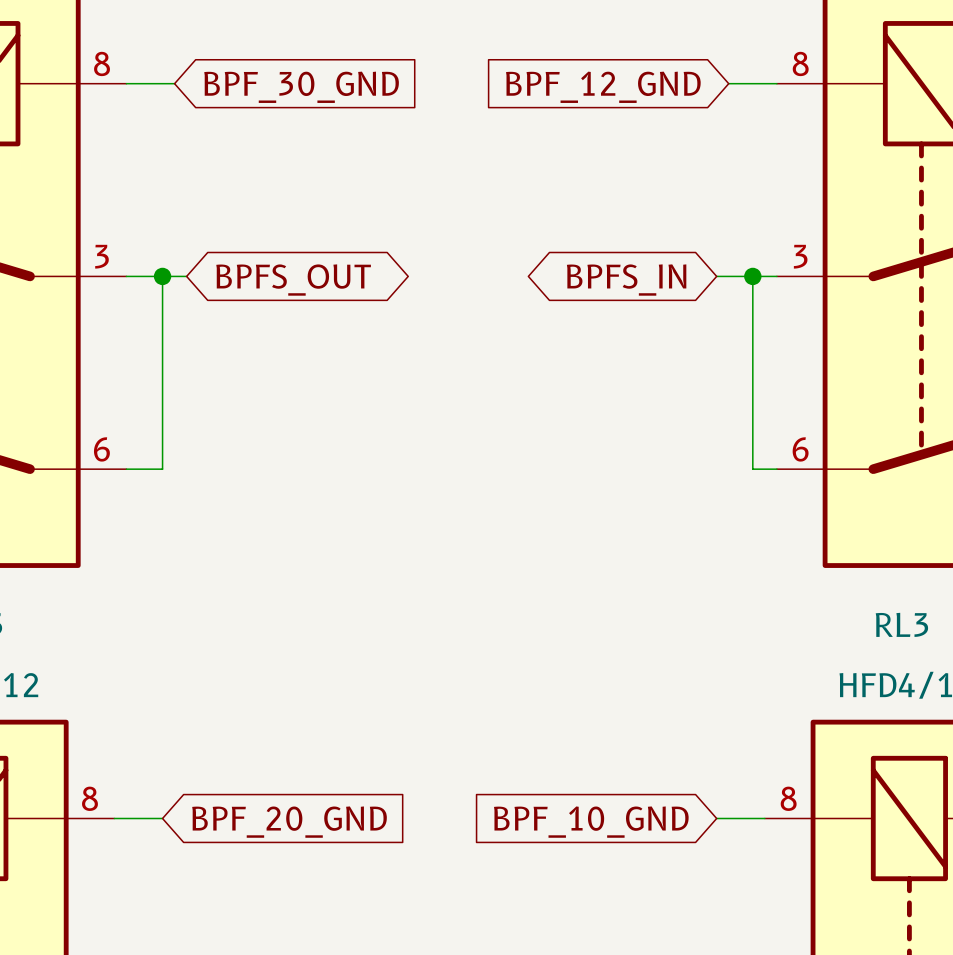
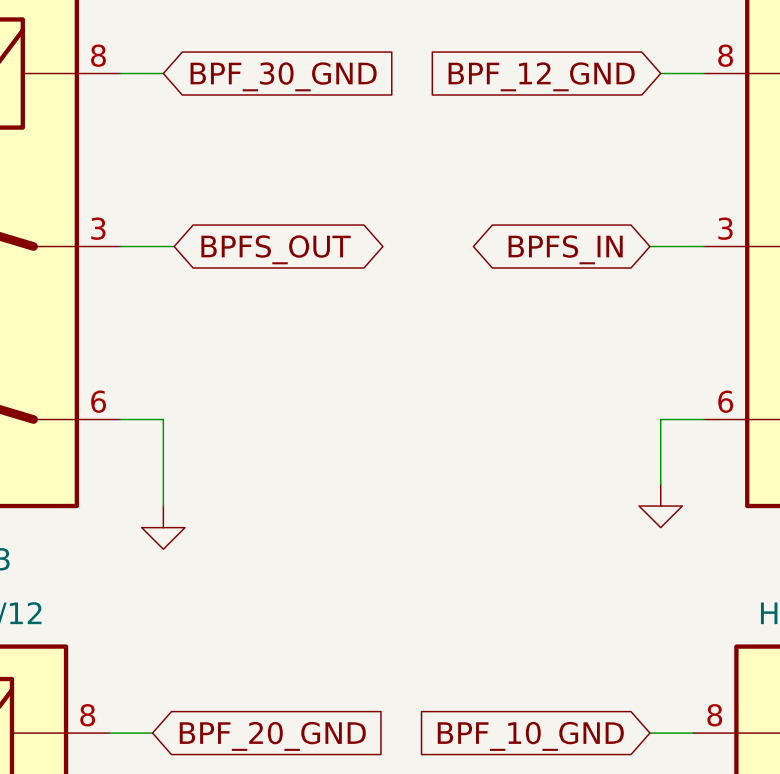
wire: (162, 276) (162, 469) -> (163, 506) (163, 419) (152, 419)
junction: (162, 276) -> none
wire: (752, 276) (752, 469) -> (660, 484) (660, 419) (682, 419)
junction: (752, 276) -> none
power symbol: none -> (660, 506)
power symbol: none -> (163, 527)

